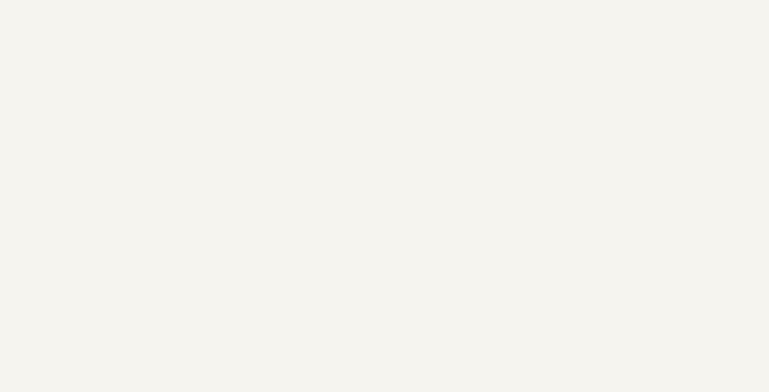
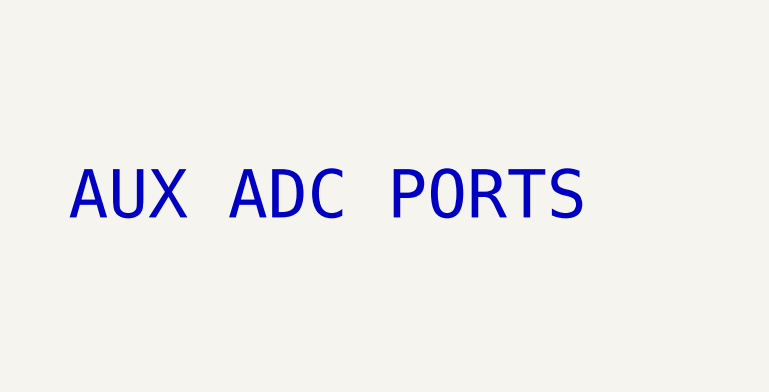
text: none -> AUX ADC PORTS (325, 193)

